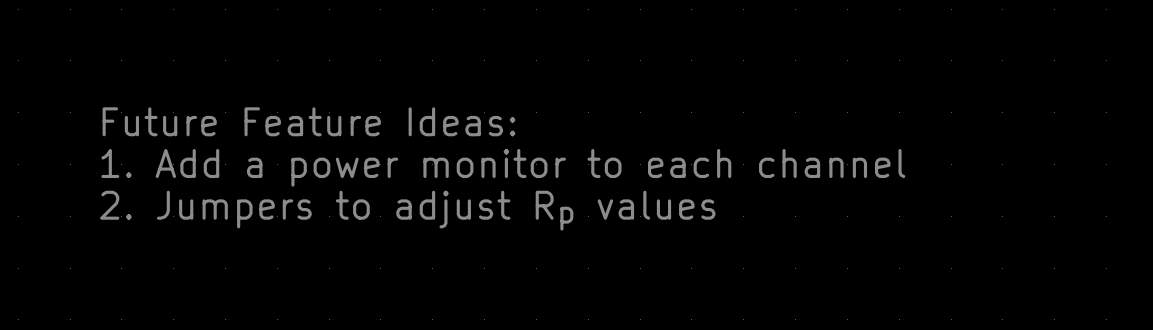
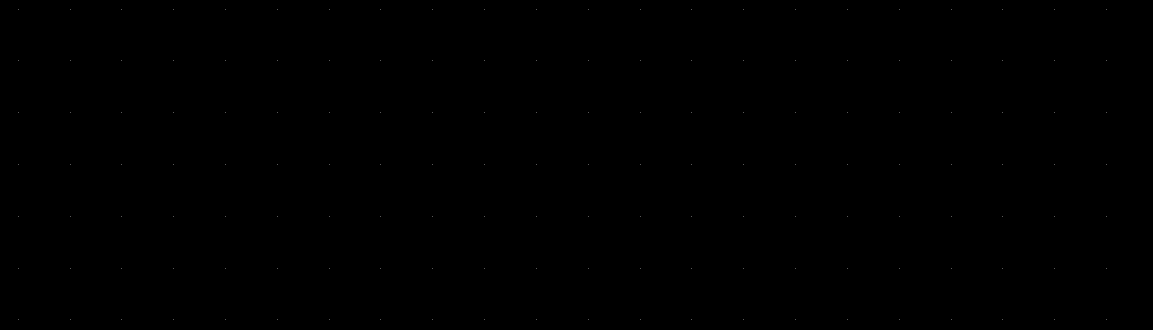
text: Future Feature Ideas: (308, 121) -> none
text: 1. Add a power monitor to each channel (503, 167) -> none
text: 2. Jumpers to adjust Rp values (407, 210) -> none

